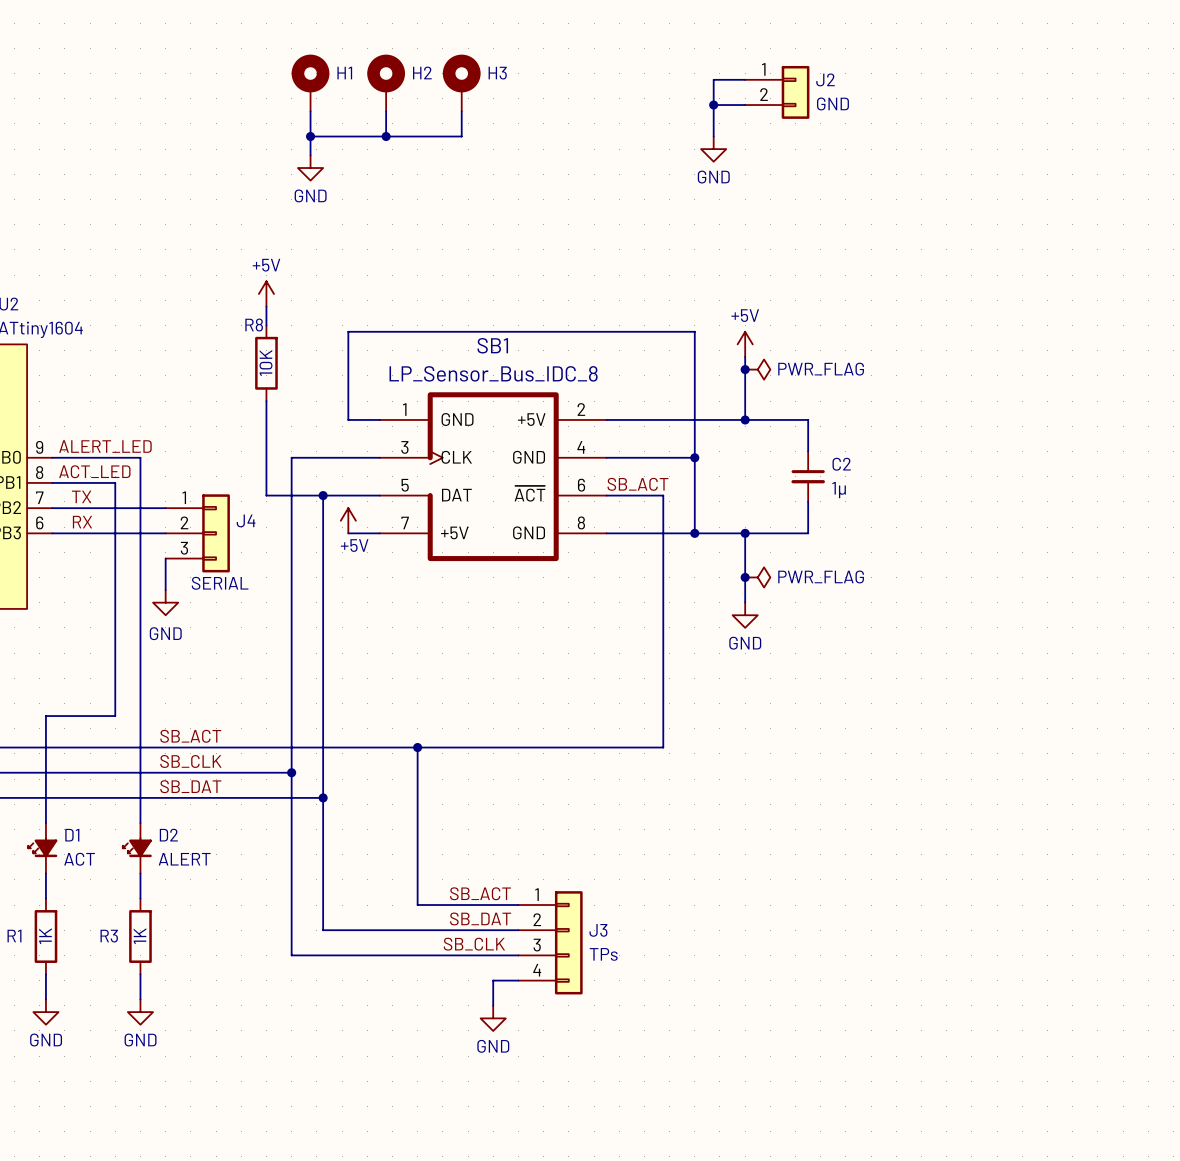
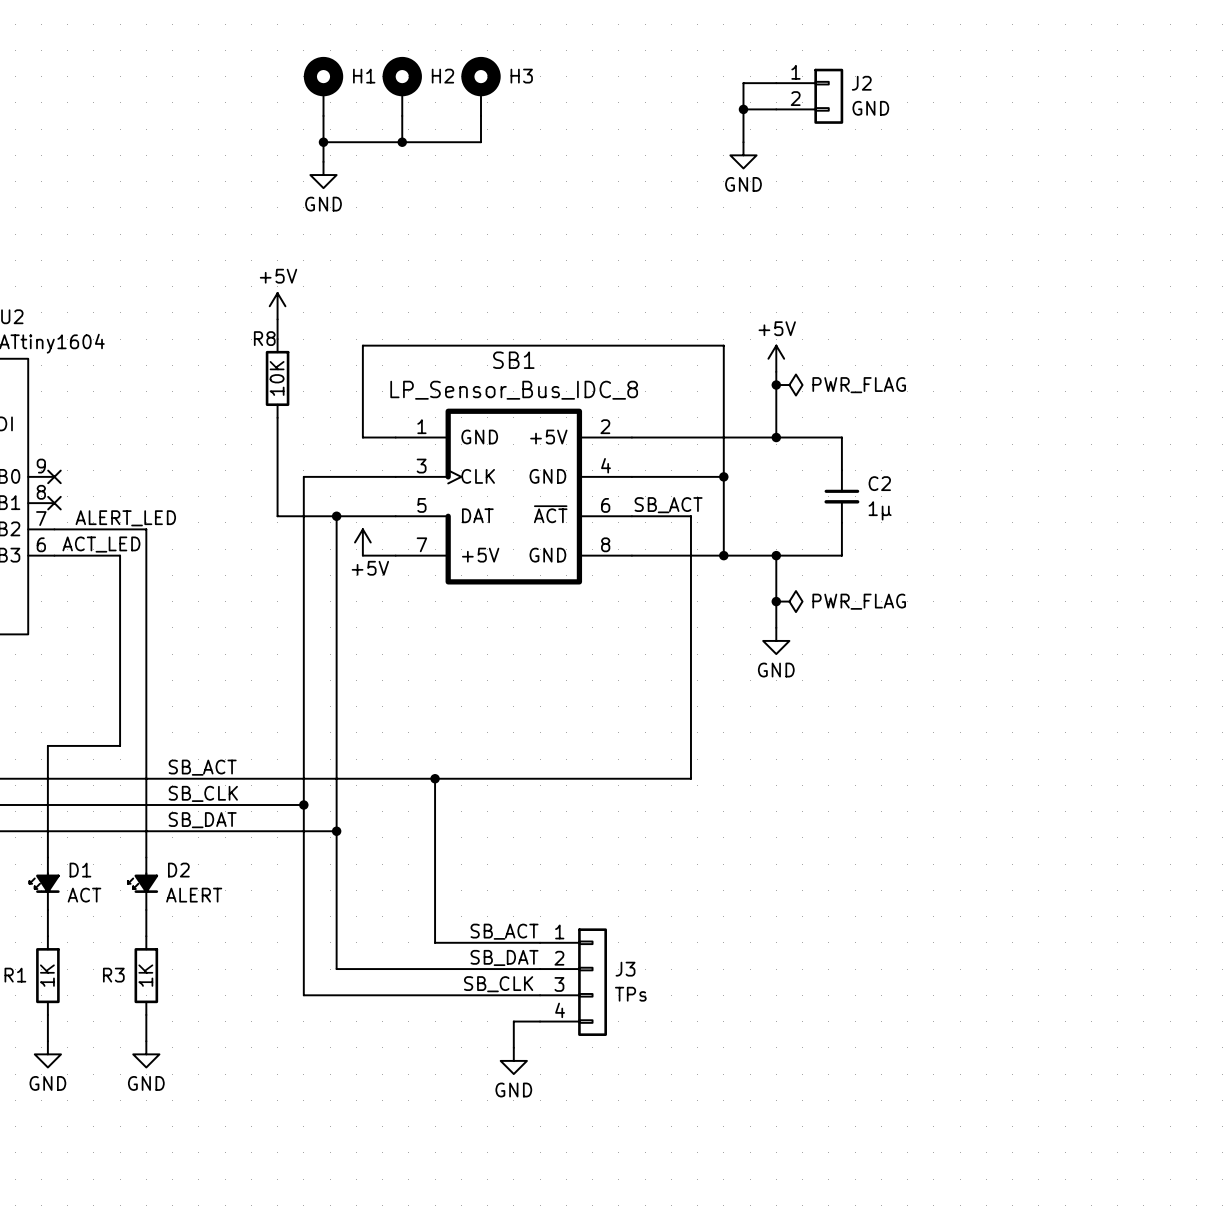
label: ALERT_LED (105, 446) -> none
wire: (52, 457) (140, 457) (140, 508) (165, 508) -> none
no-connect mark: none -> (54, 476)
label position: ACT_LED (94, 471) -> ACT_LED (101, 544)
wire: (52, 482) (115, 482) (115, 533) (165, 533) -> none
no-connect mark: none -> (54, 503)
label: TX (81, 496) -> ALERT_LED (125, 518)
label: RX (82, 522) -> none
J4: SERIAL (197, 533) -> none
wire: (165, 558) (165, 590) -> none
power symbol: GND (165, 602) -> none

